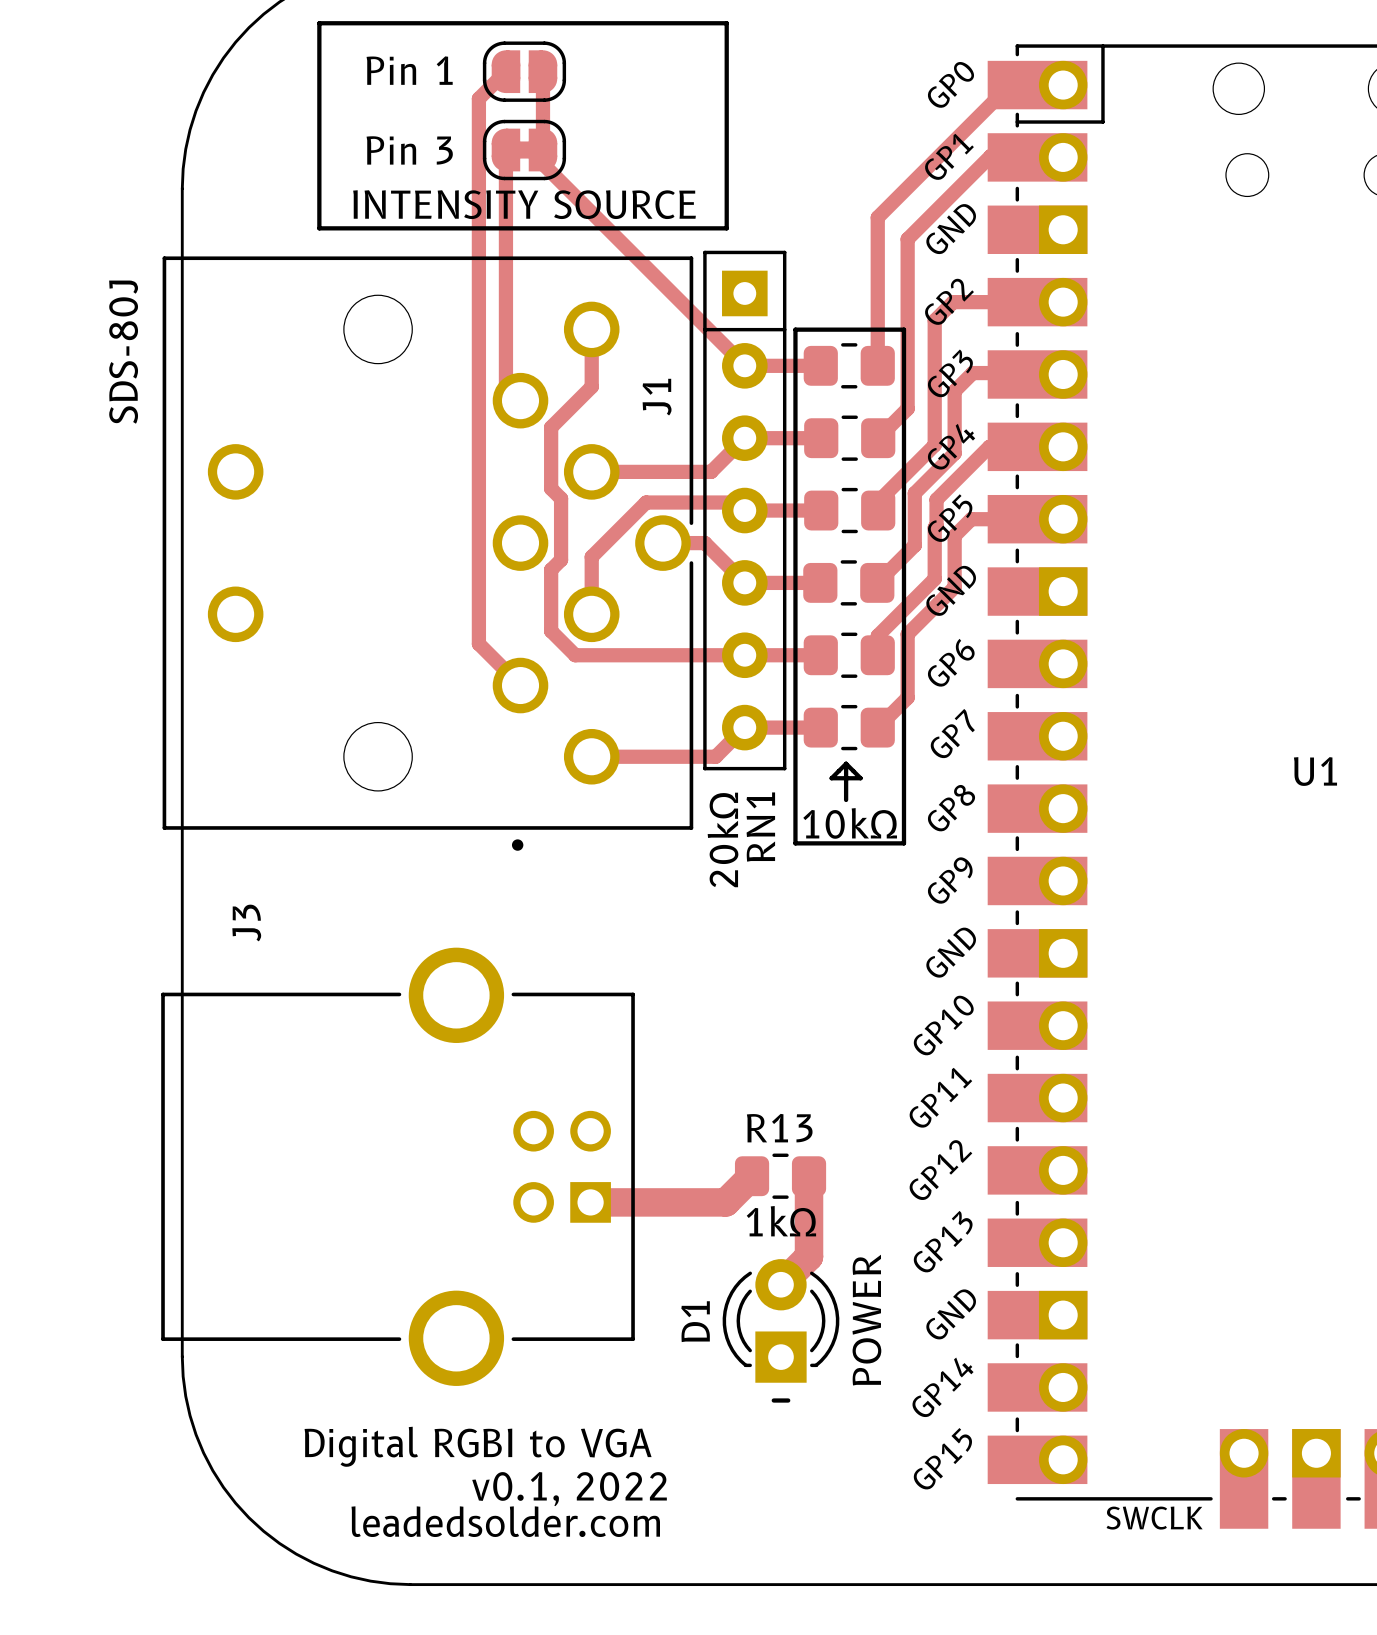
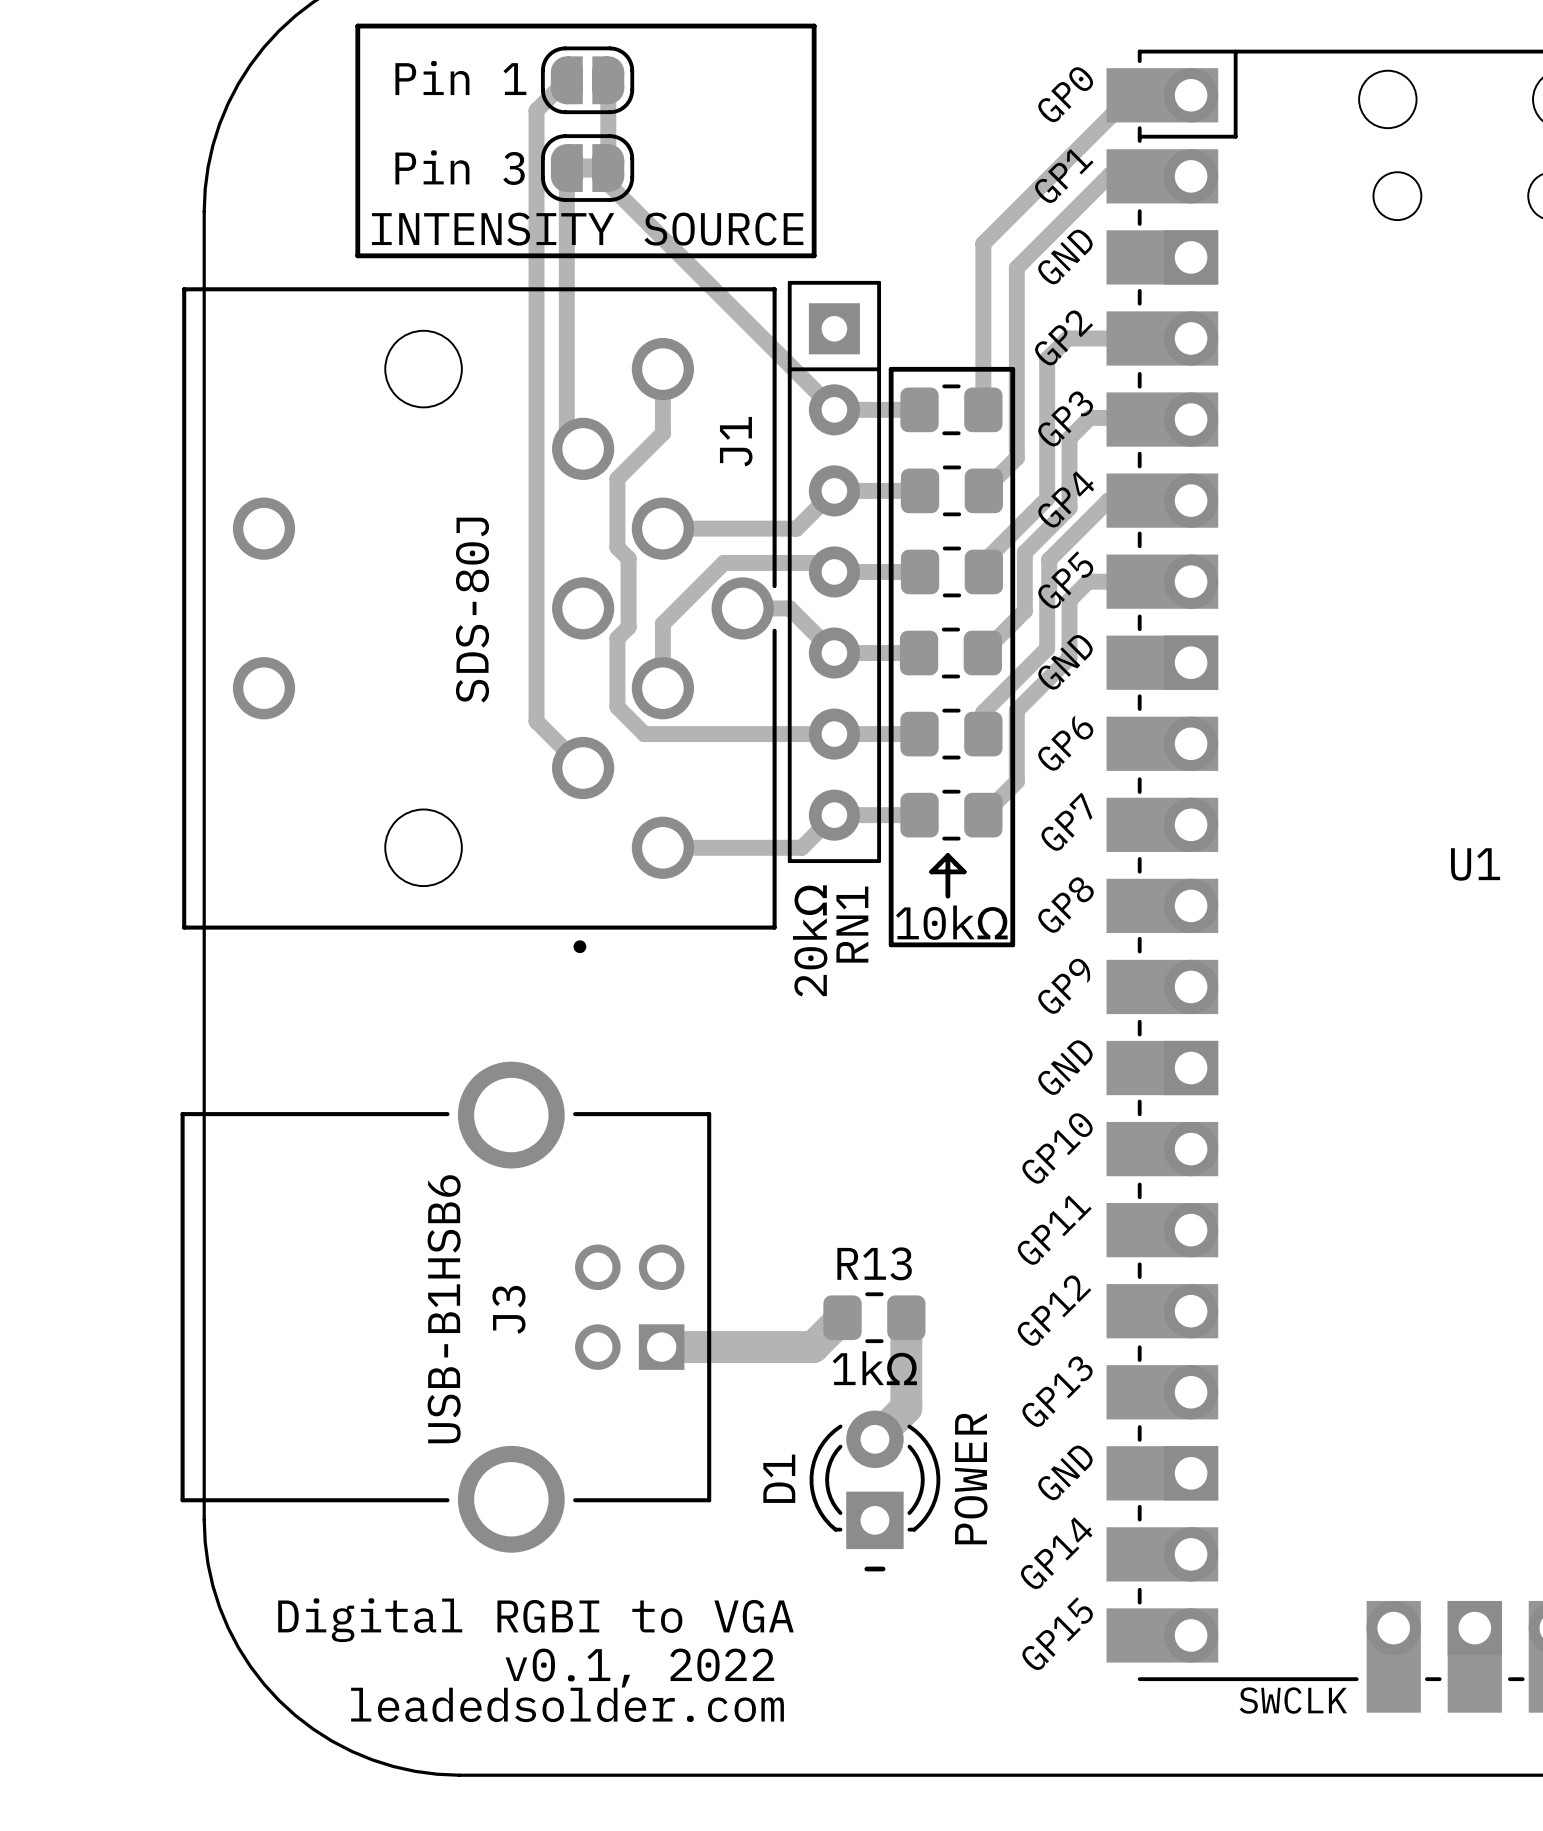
J1 value position: SDS-80J (123, 352) -> SDS-80J (472, 610)
J3 name position: J3 (246, 923) -> J3 (508, 1309)
J3 value: none -> USB-B1HSB6 (444, 1309)

